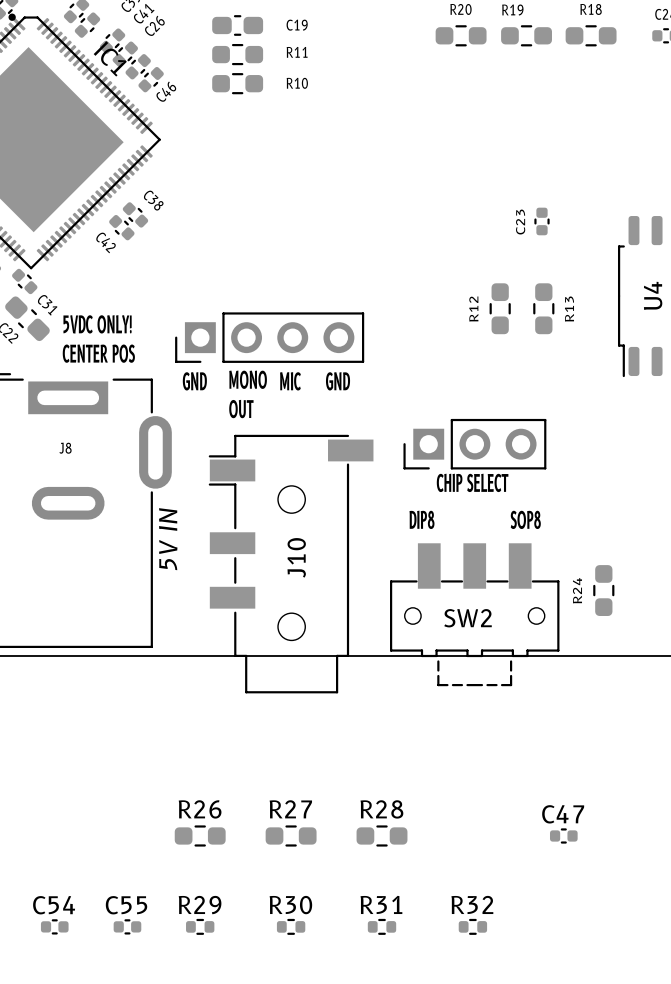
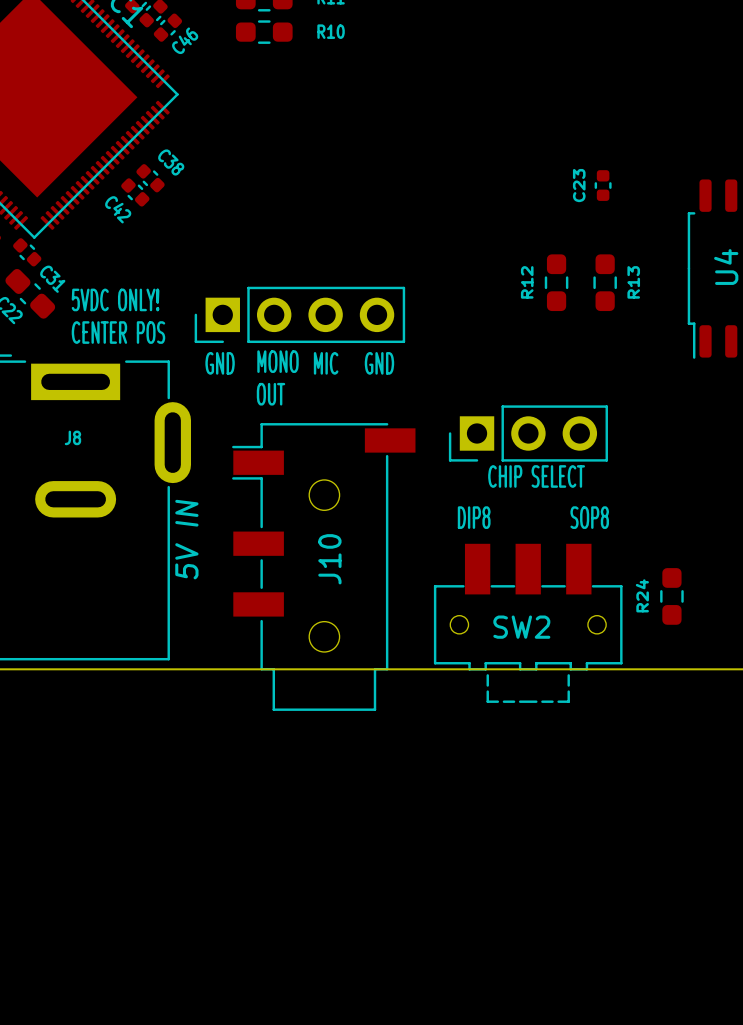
R26: (200, 835) -> none
R27: (291, 835) -> none
R28: (382, 835) -> none
C47: (563, 835) -> none
C54: (54, 926) -> none
C55: (127, 926) -> none
R29: (200, 926) -> none
R30: (291, 926) -> none
R31: (382, 926) -> none
R32: (472, 926) -> none

